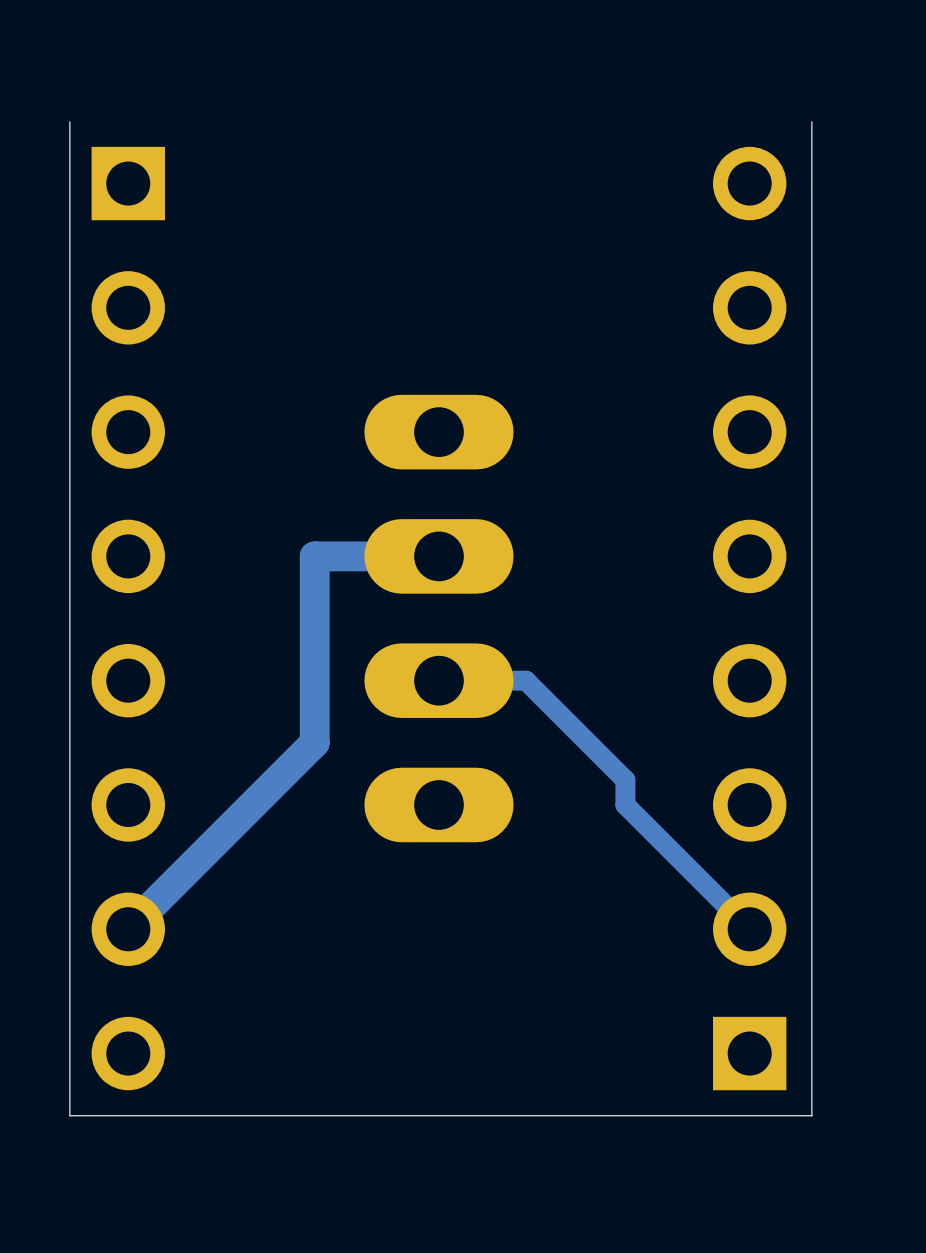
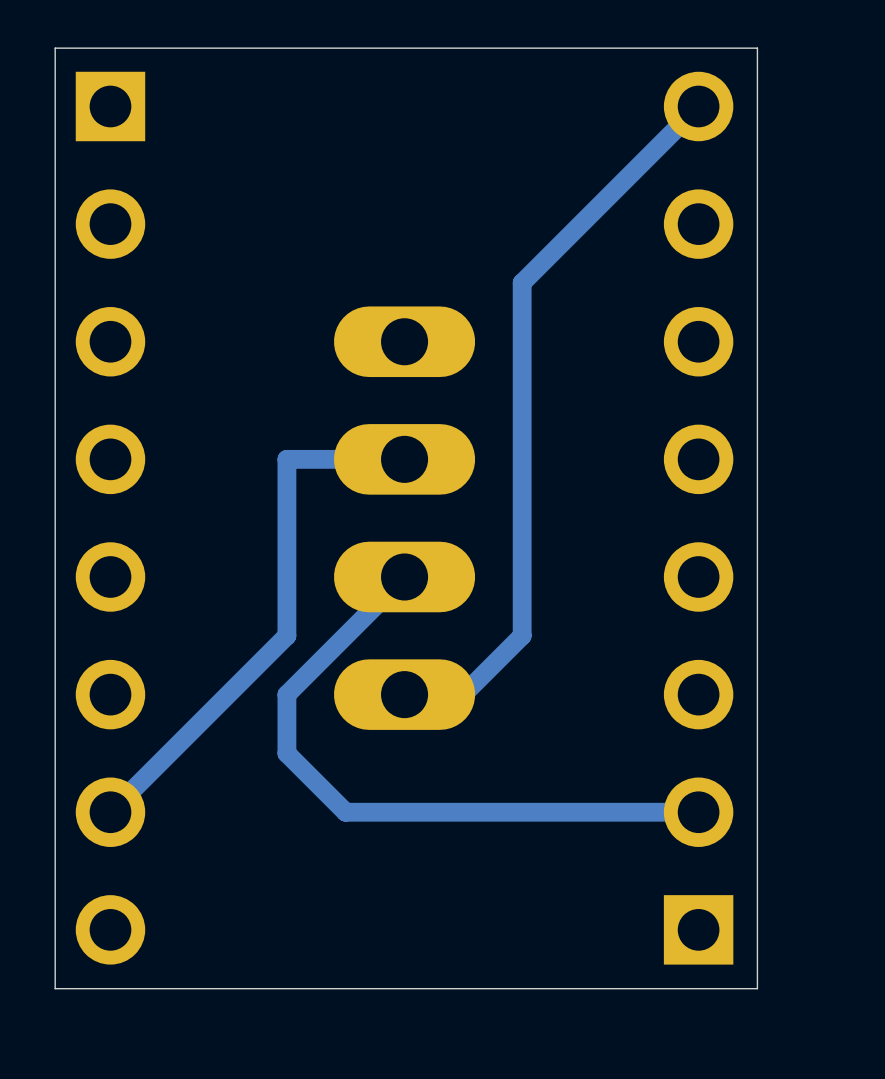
board edge: none -> (757, 48) (55, 48)
track: none -> (698, 106) (522, 282) (522, 635) (463, 694) (404, 694)
track width: thick (438, 556) (314, 556) (314, 742) (128, 929) -> thin (404, 459) (286, 459) (286, 635) (110, 812)
track: (438, 680) (525, 680) (625, 780) (625, 804) (749, 929) -> (404, 576) (286, 694) (286, 753) (345, 812) (698, 812)

